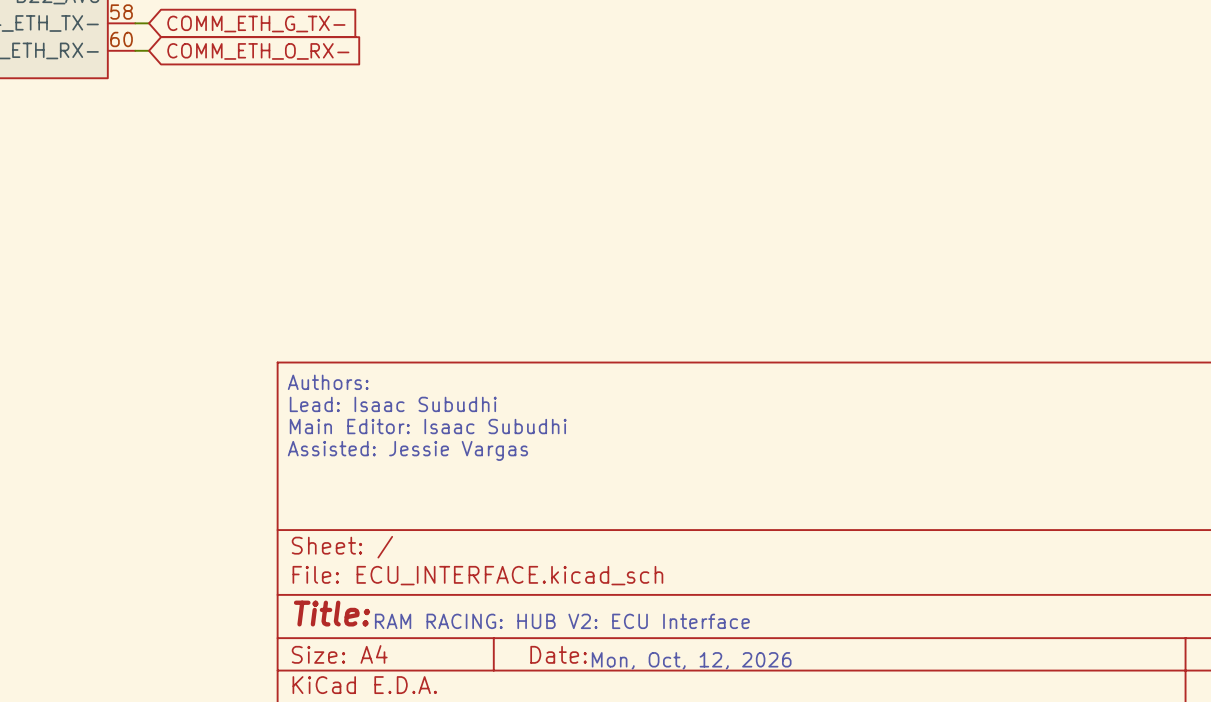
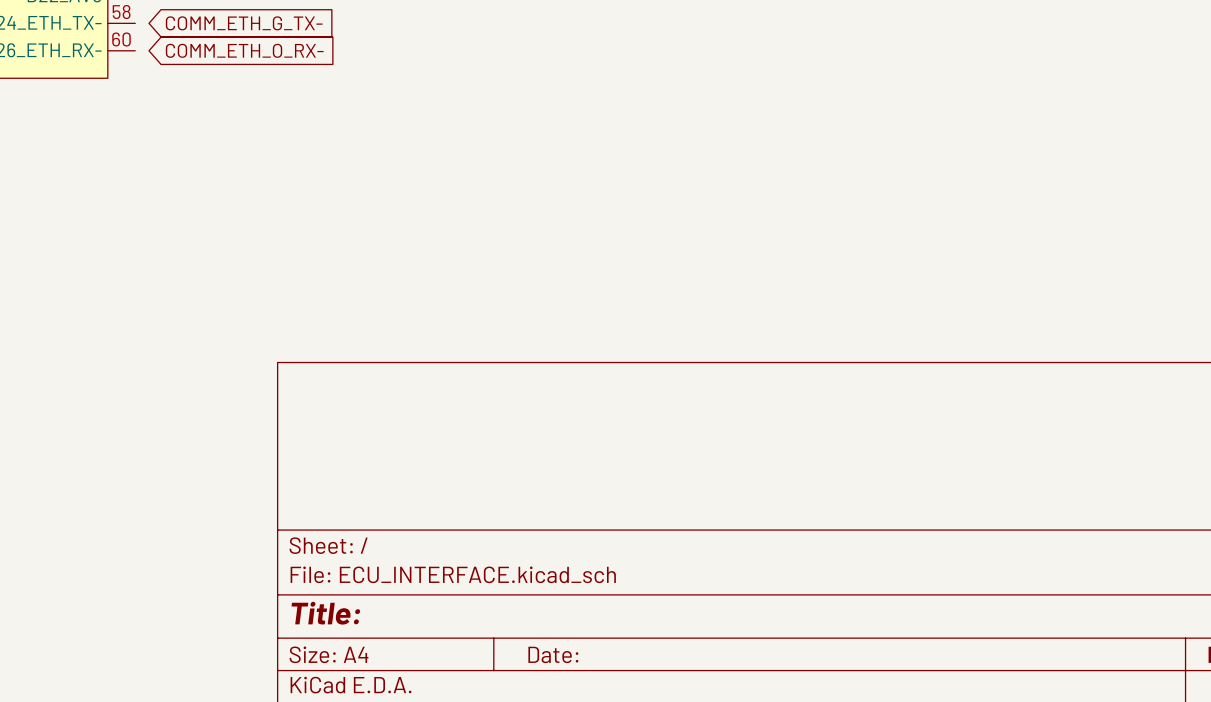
wire: (135, 23) (149, 23) -> none
wire: (135, 50) (149, 50) -> none
text: Authors: (328, 382) -> none
text: Lead: Isaac Subudhi (393, 404) -> none
text: Main Editor: Isaac Subudhi (428, 426) -> none
text: Assisted: Jessie Vargas (407, 450) -> none
text: RAM RACING: HUB V2: ECU Interface (562, 621) -> none
text: Mon, Oct, 12, 2026 (691, 660) -> none

